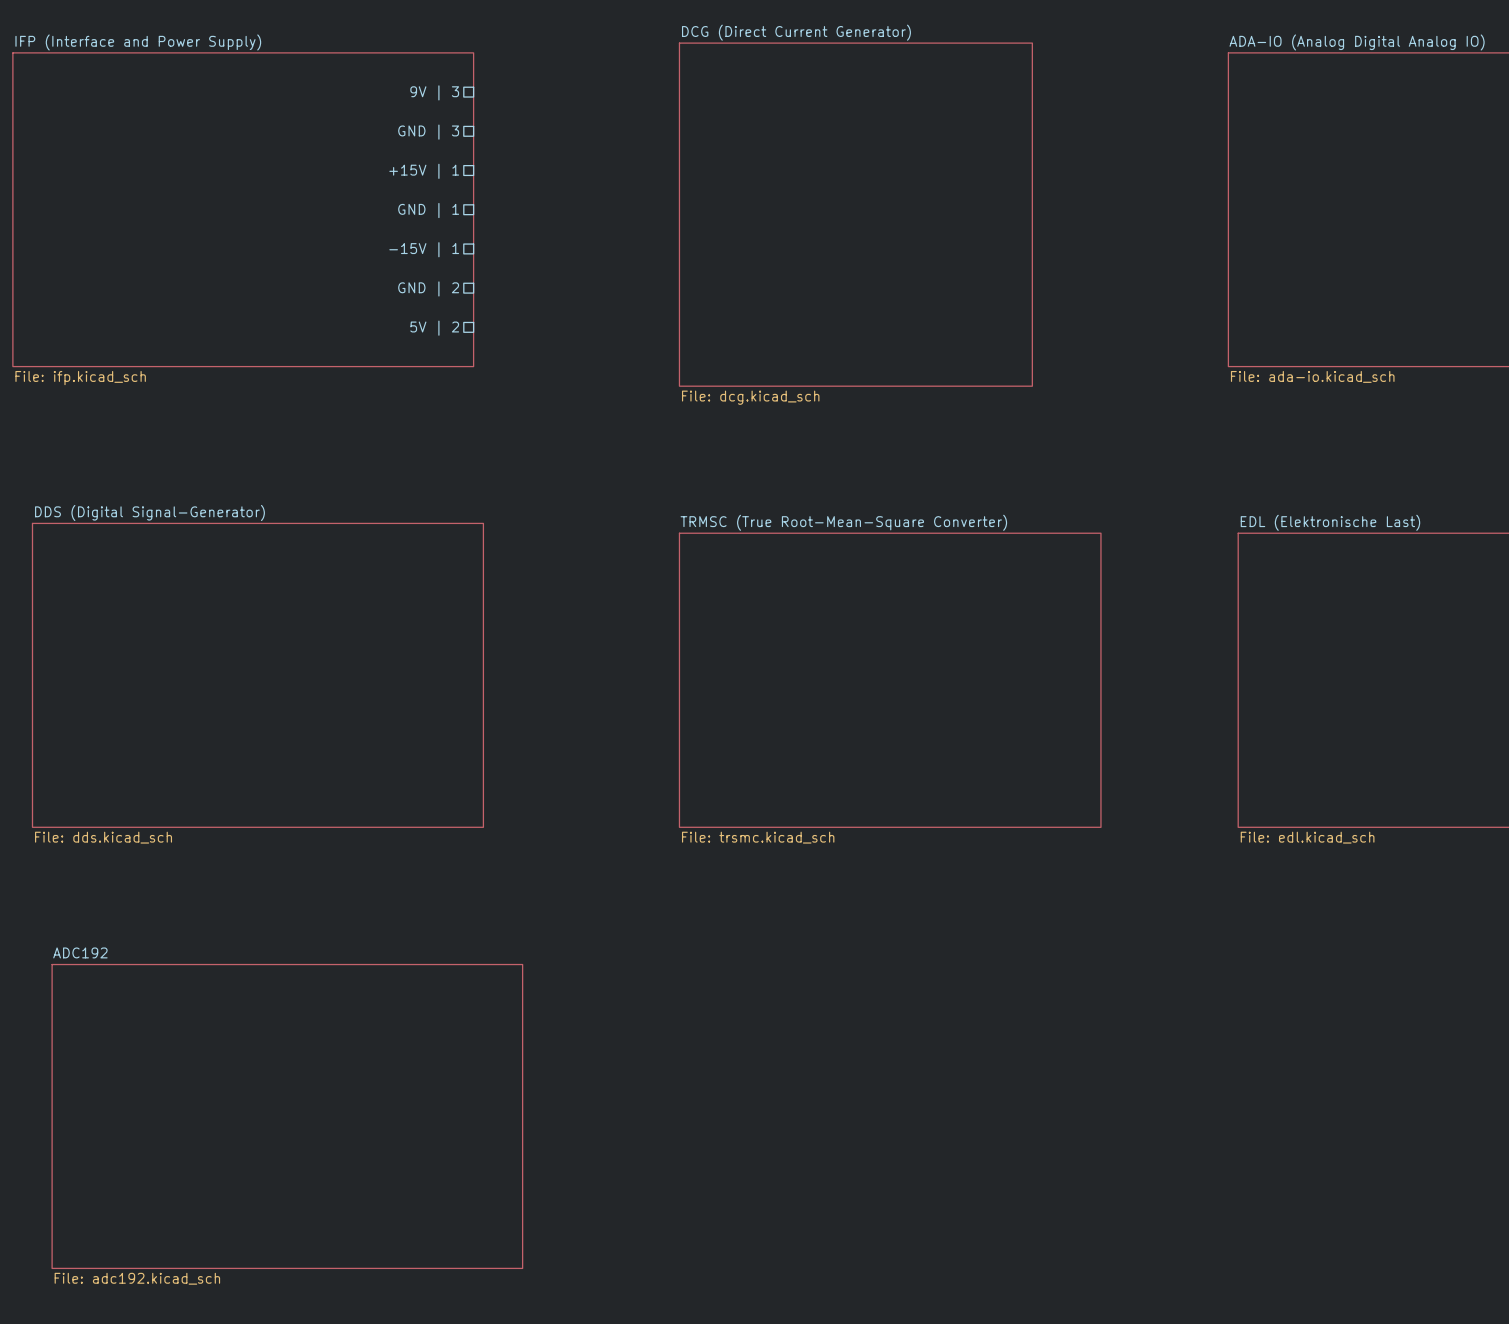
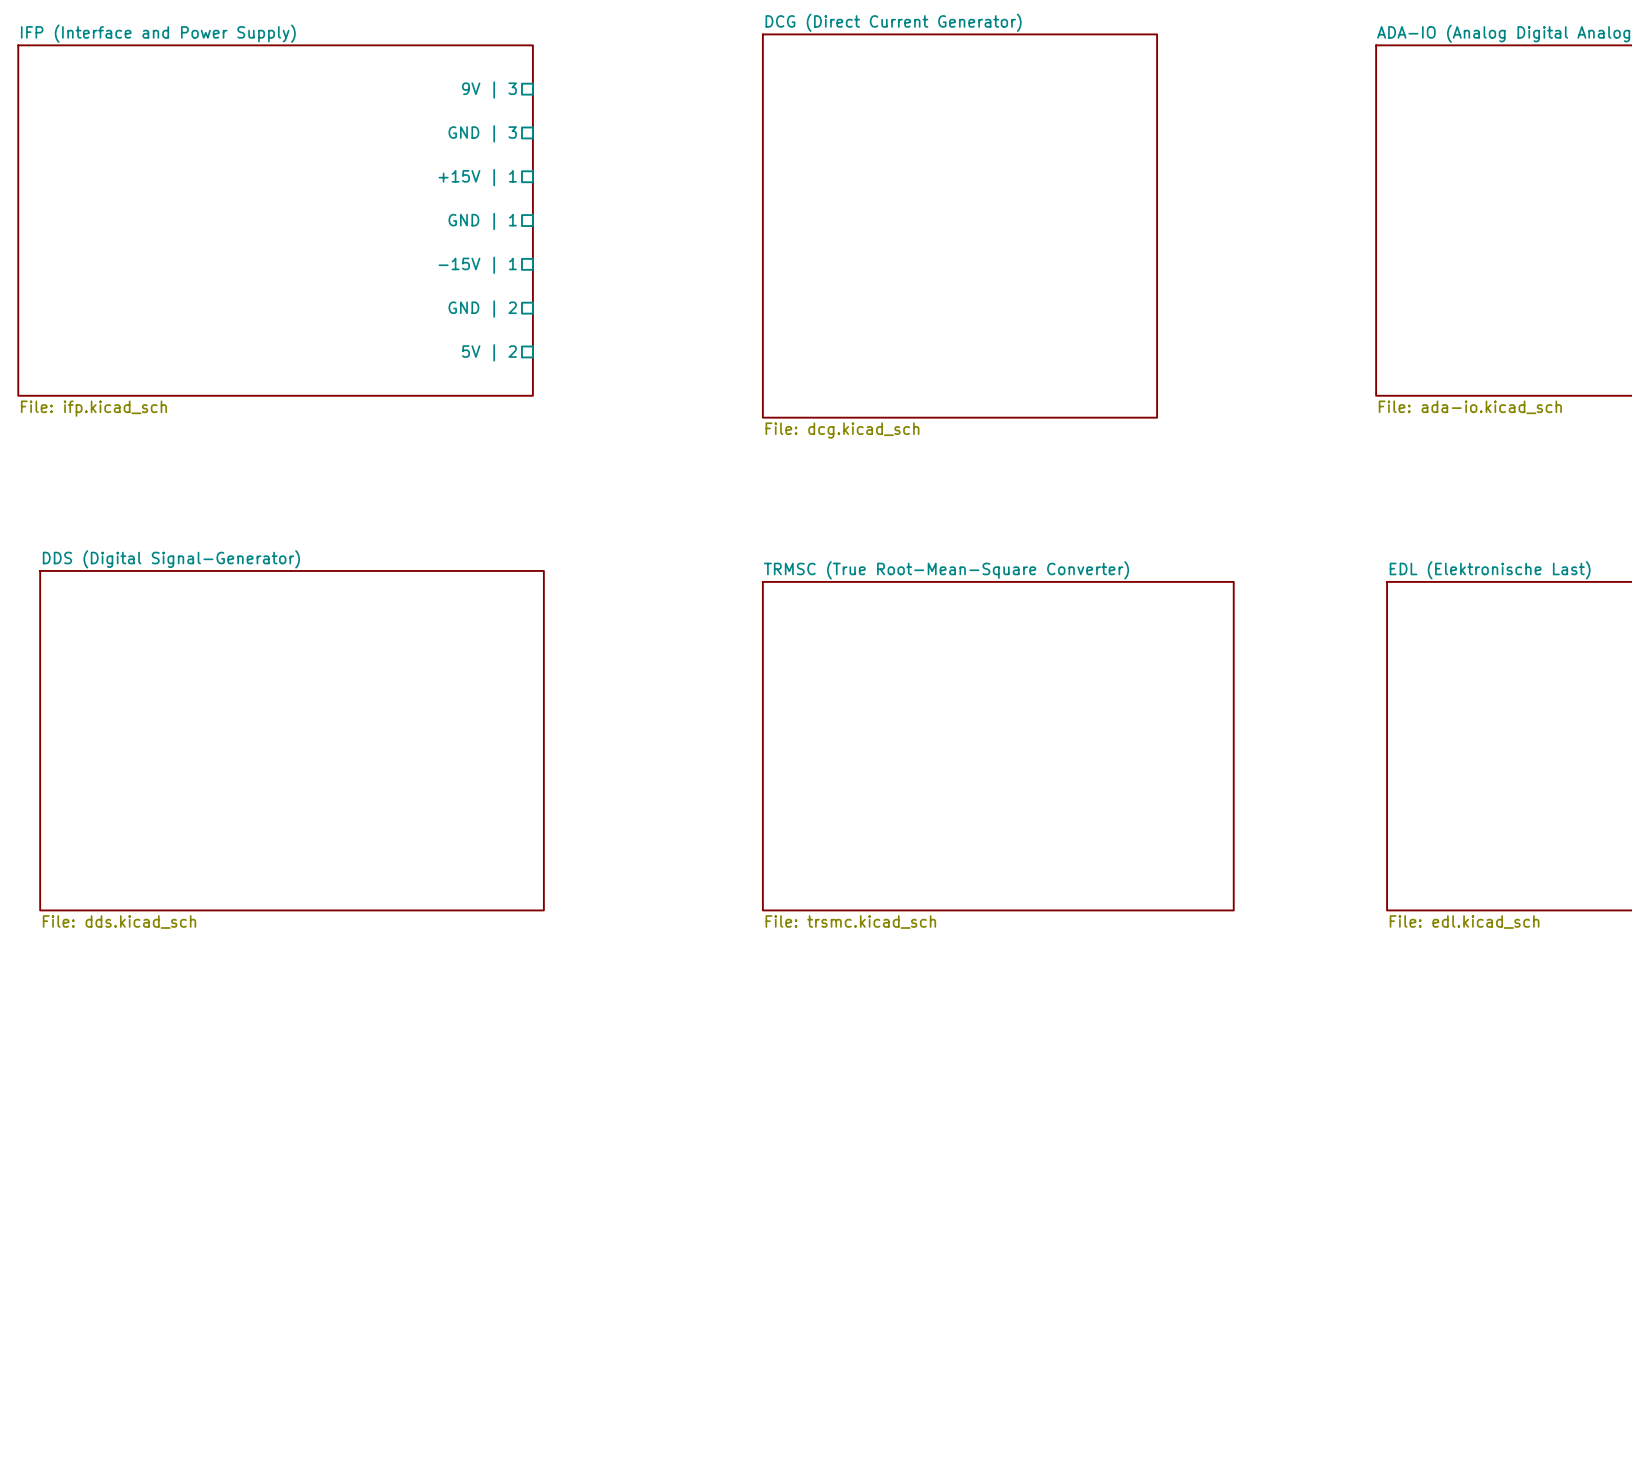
sheet ADC192: File: adc192.kicad_sch (287, 1116) -> none

